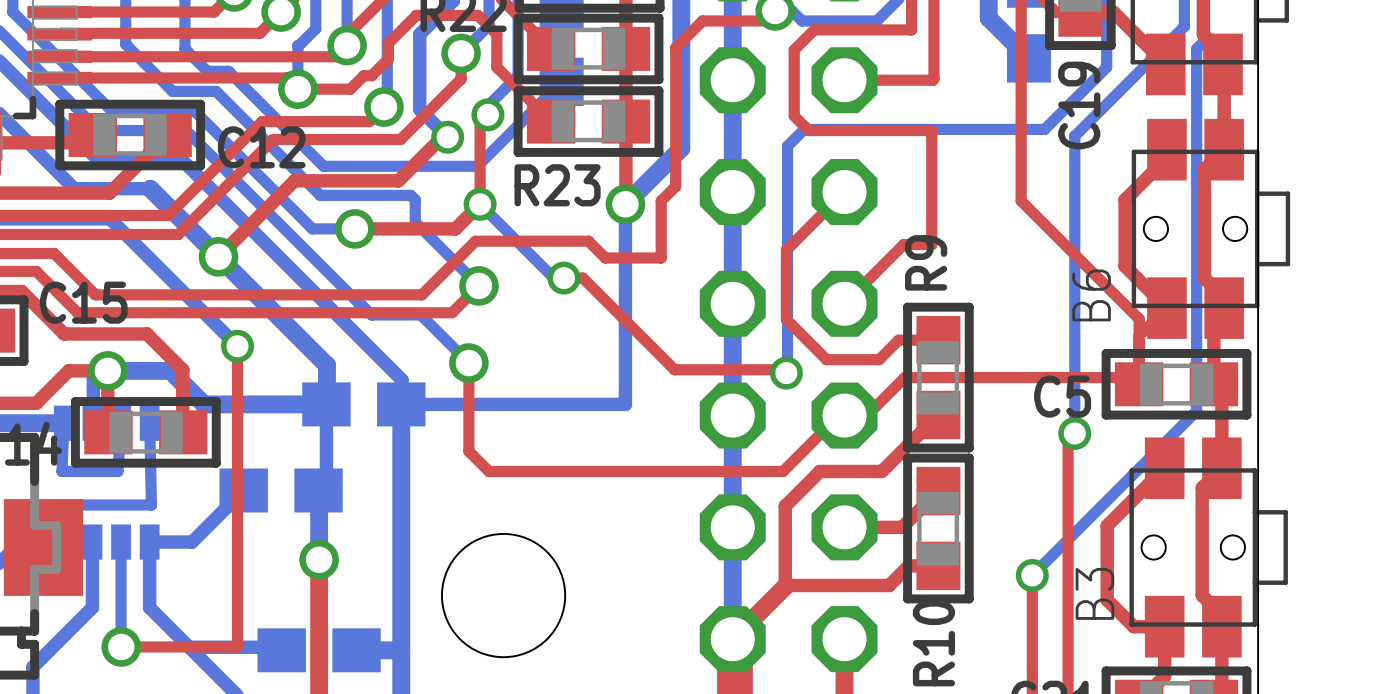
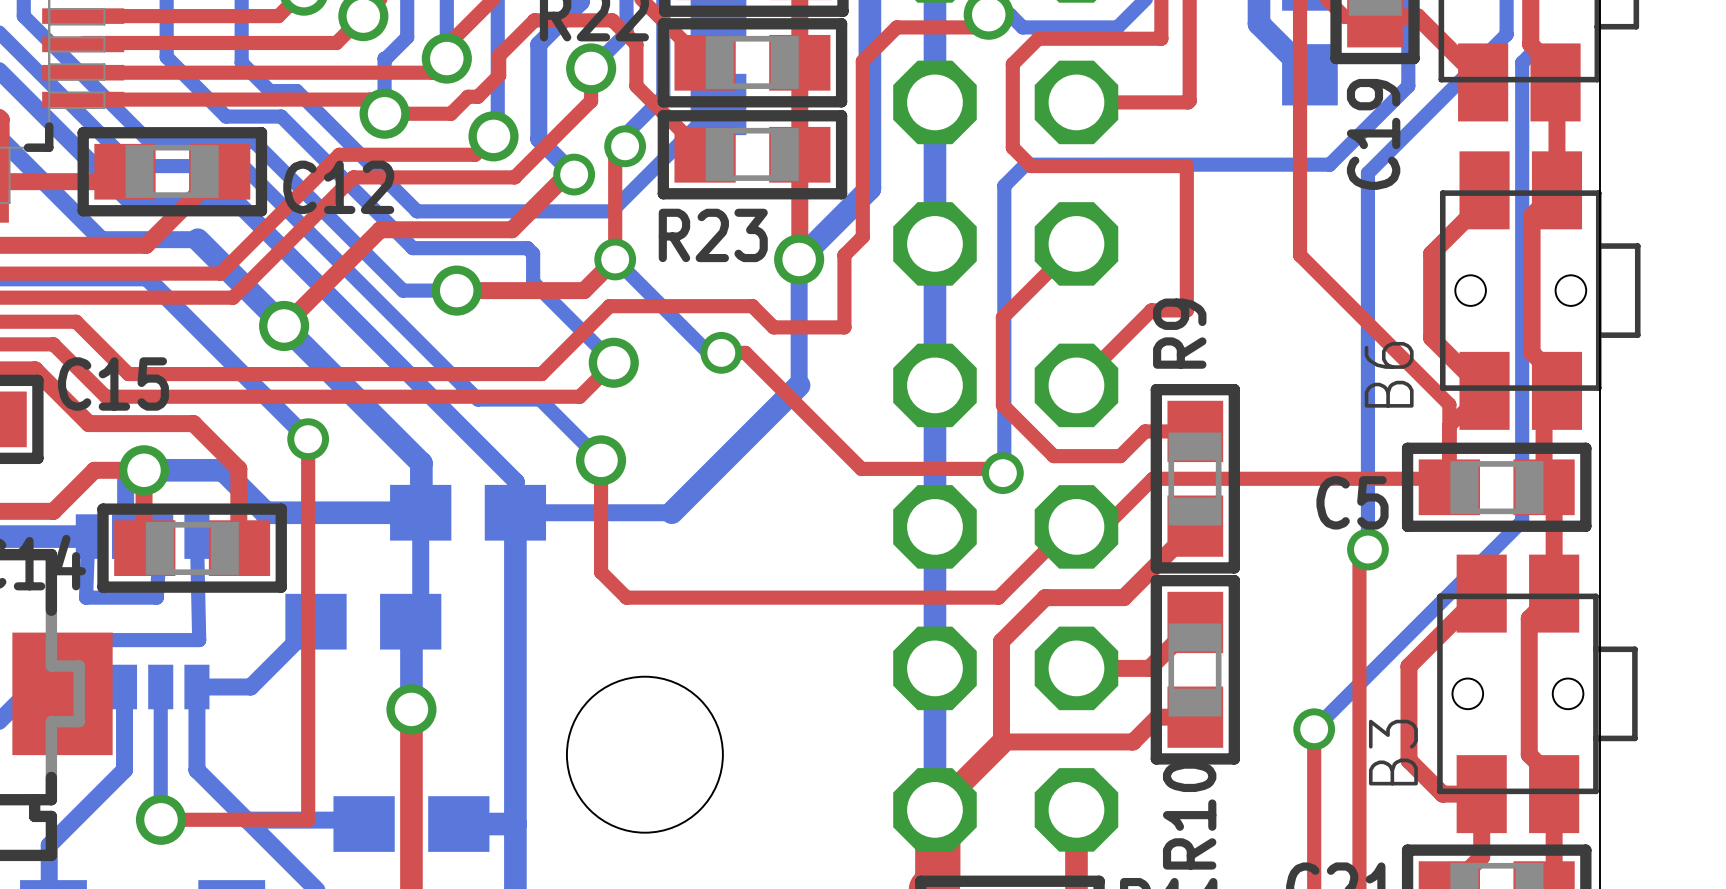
bottom track: (625, 303) (625, 404) (524, 404) -> (799, 385) (671, 512)

